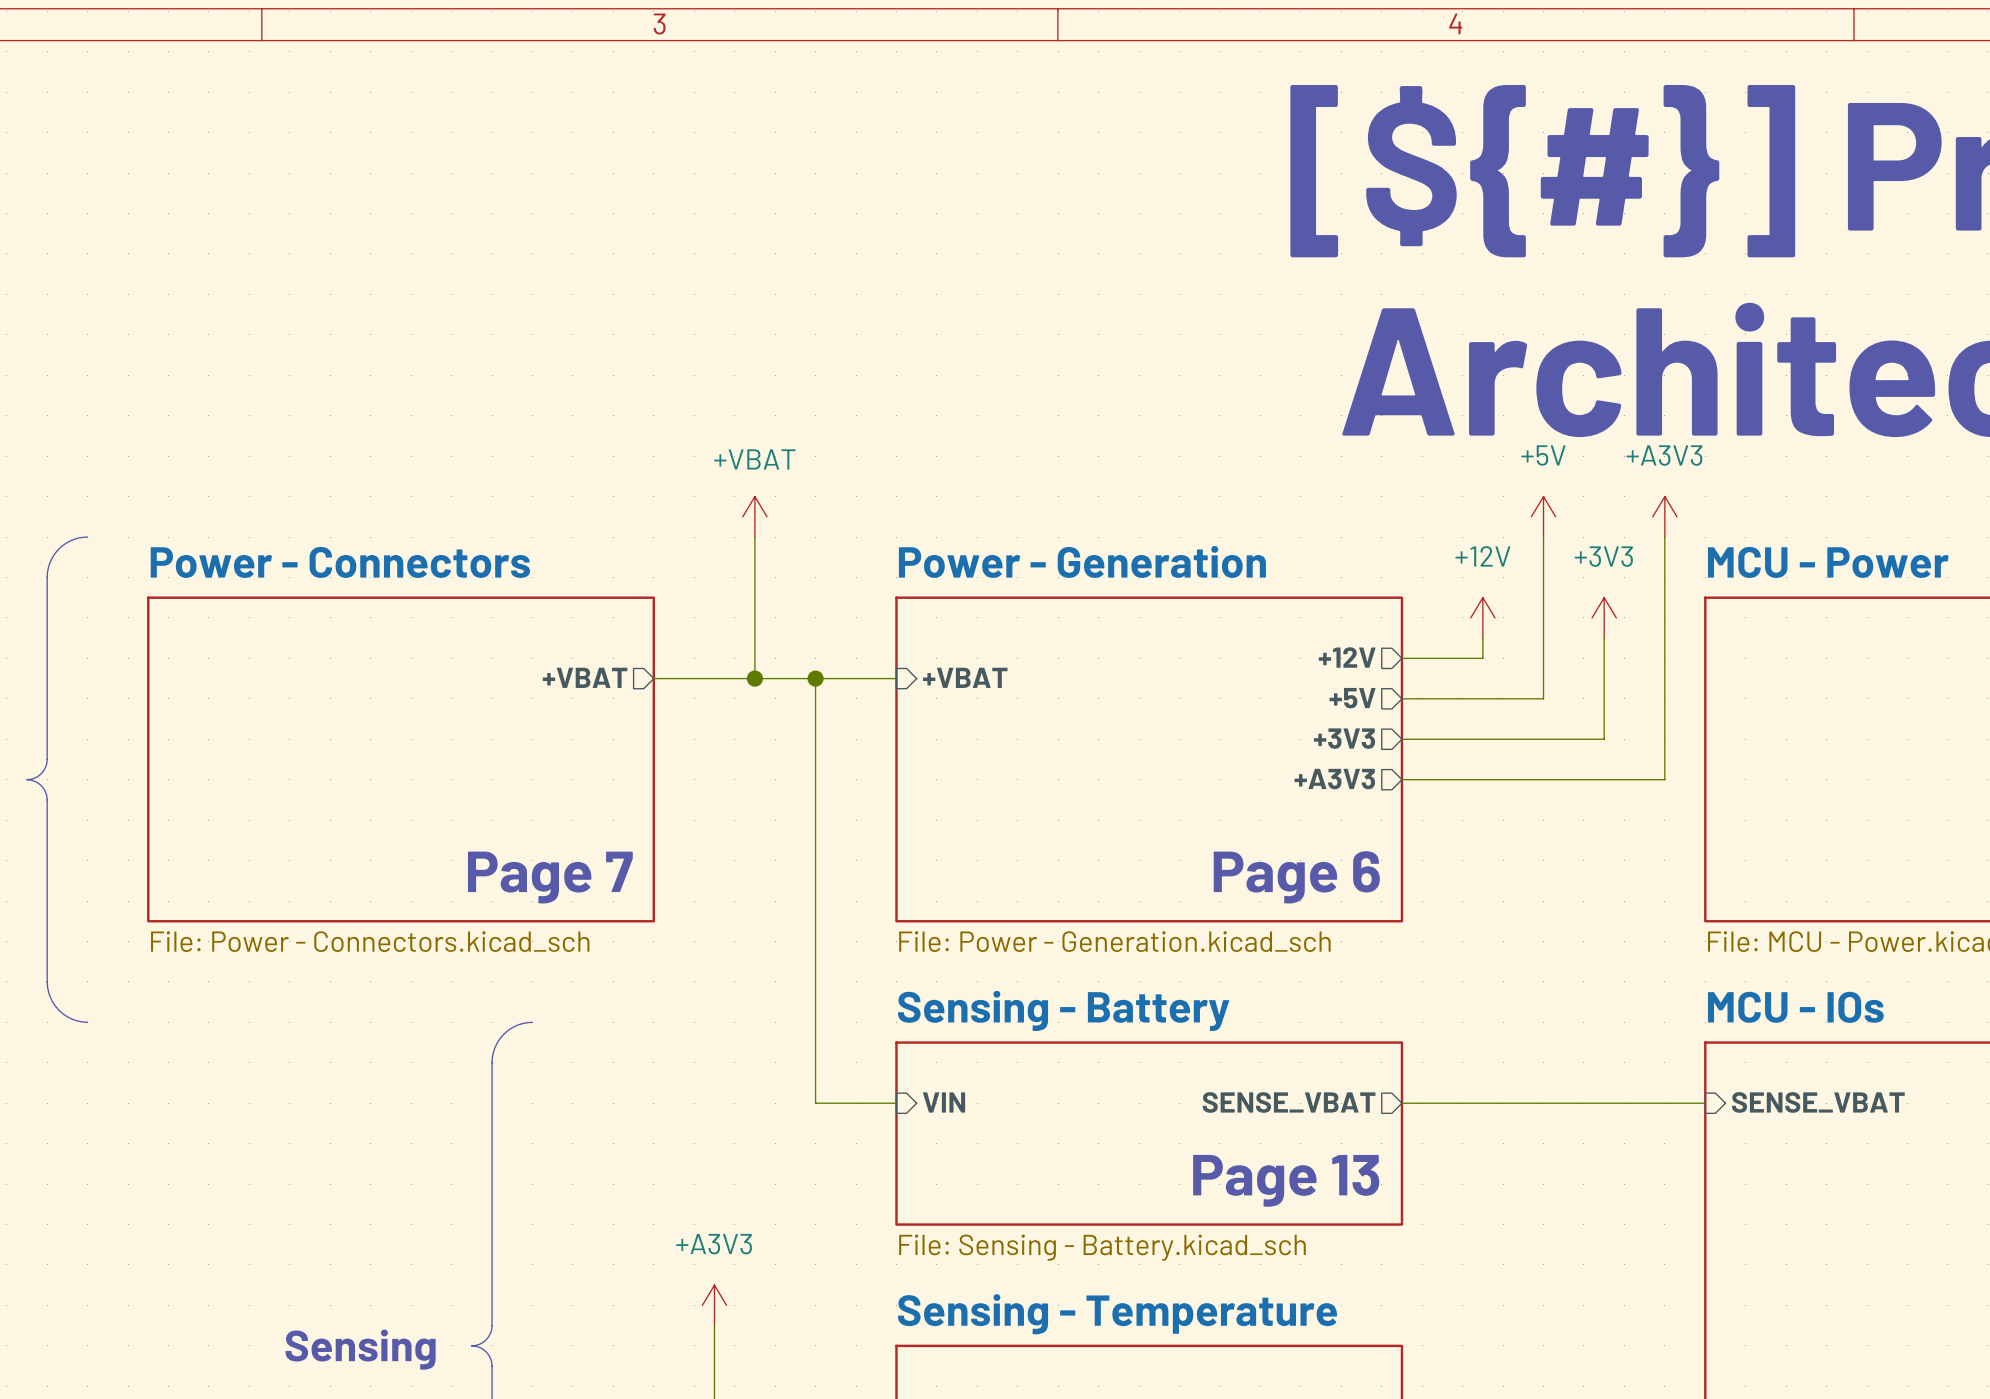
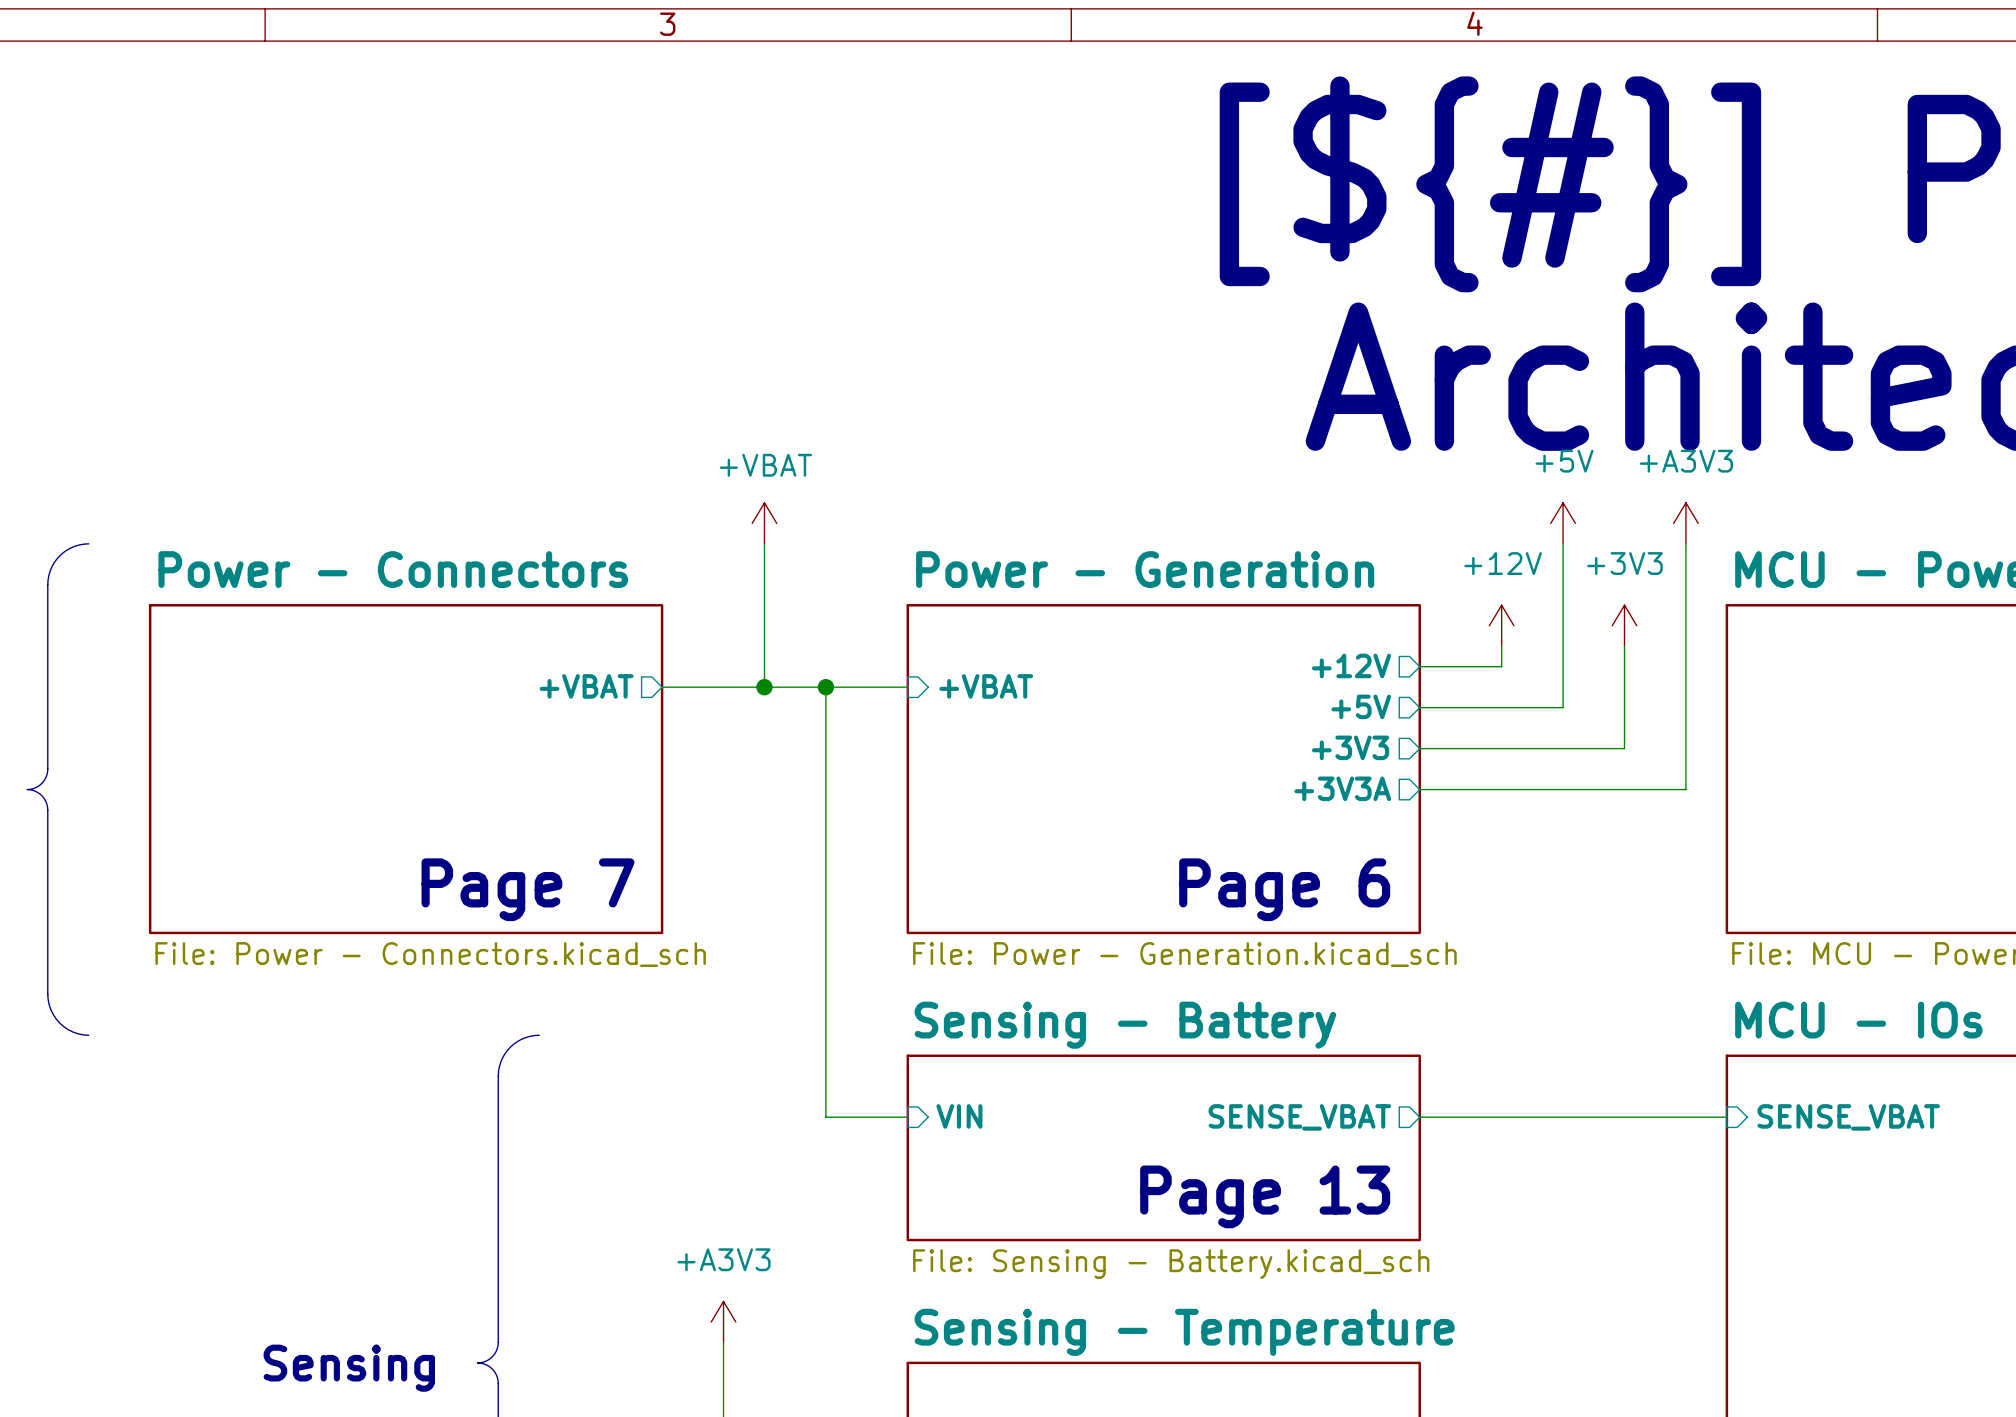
sheet pin: +A3V3 (1334, 779) -> +3V3A (1342, 788)

